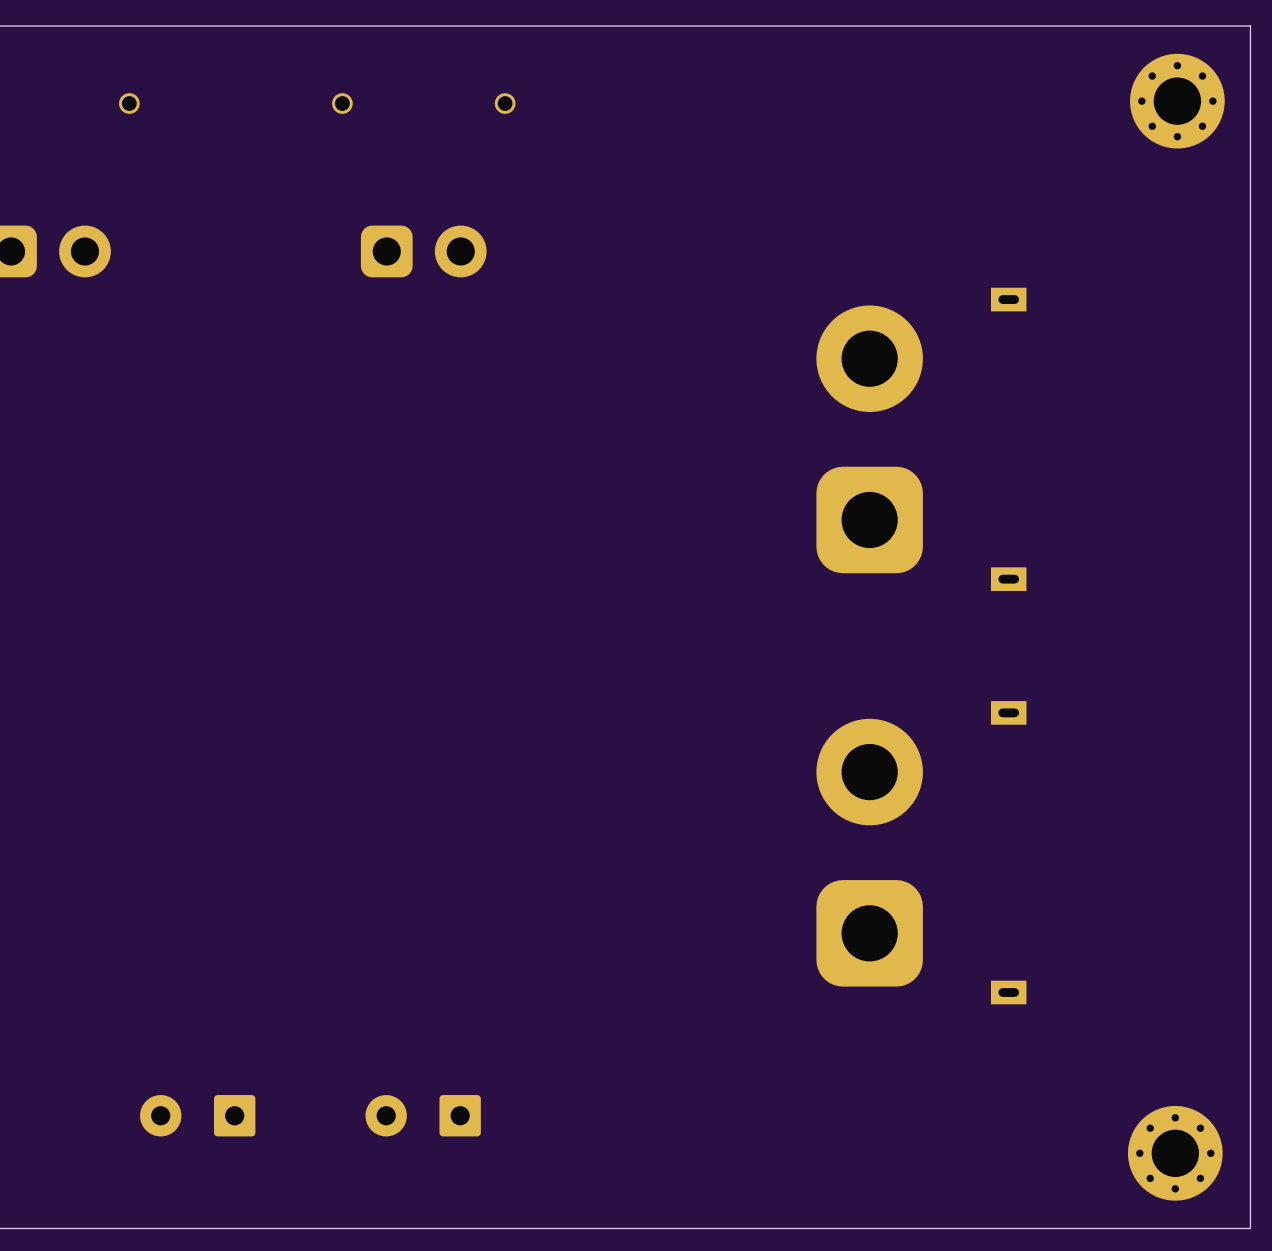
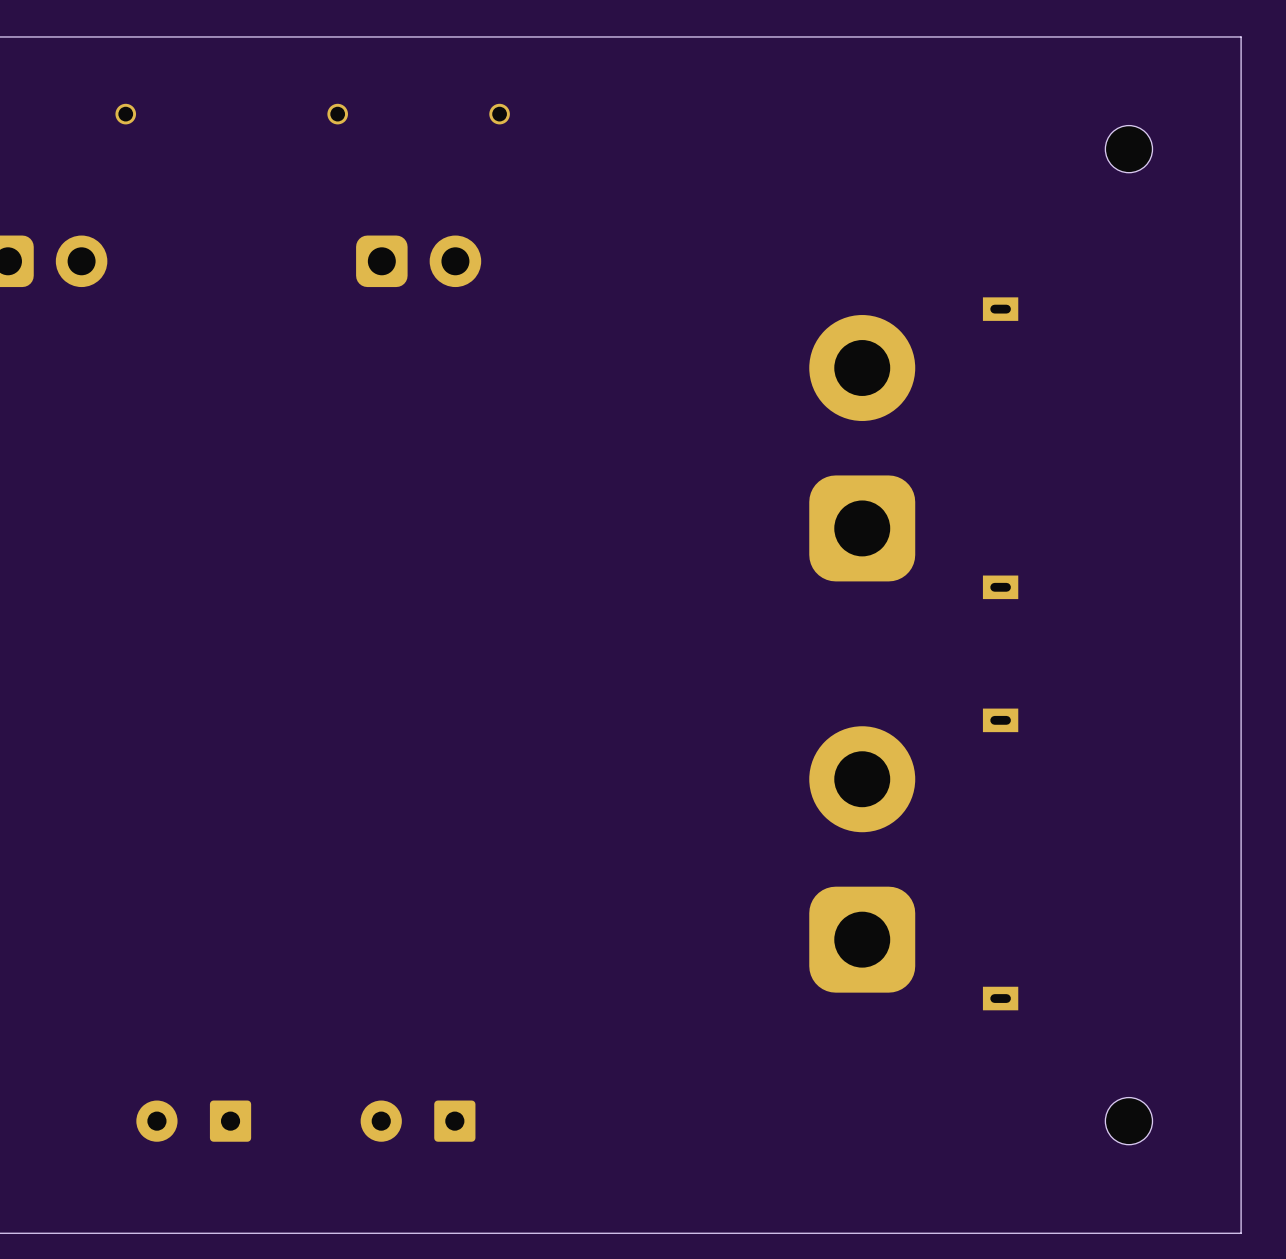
part: (1177, 101) -> none
part: none -> (1128, 149)
part: none -> (1128, 1121)
part: (1175, 1153) -> none

